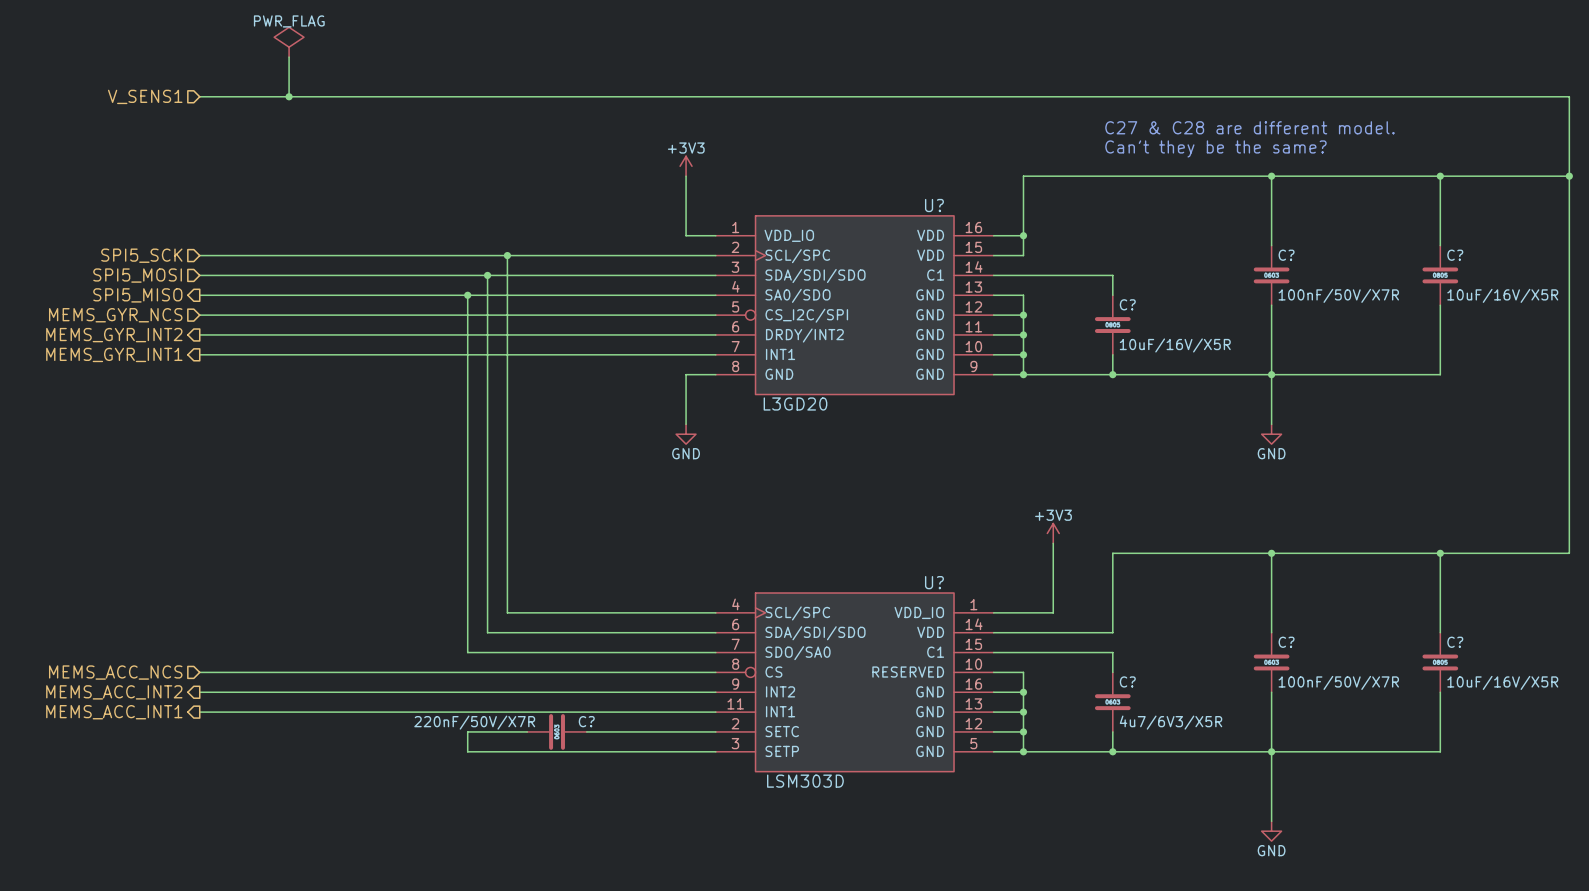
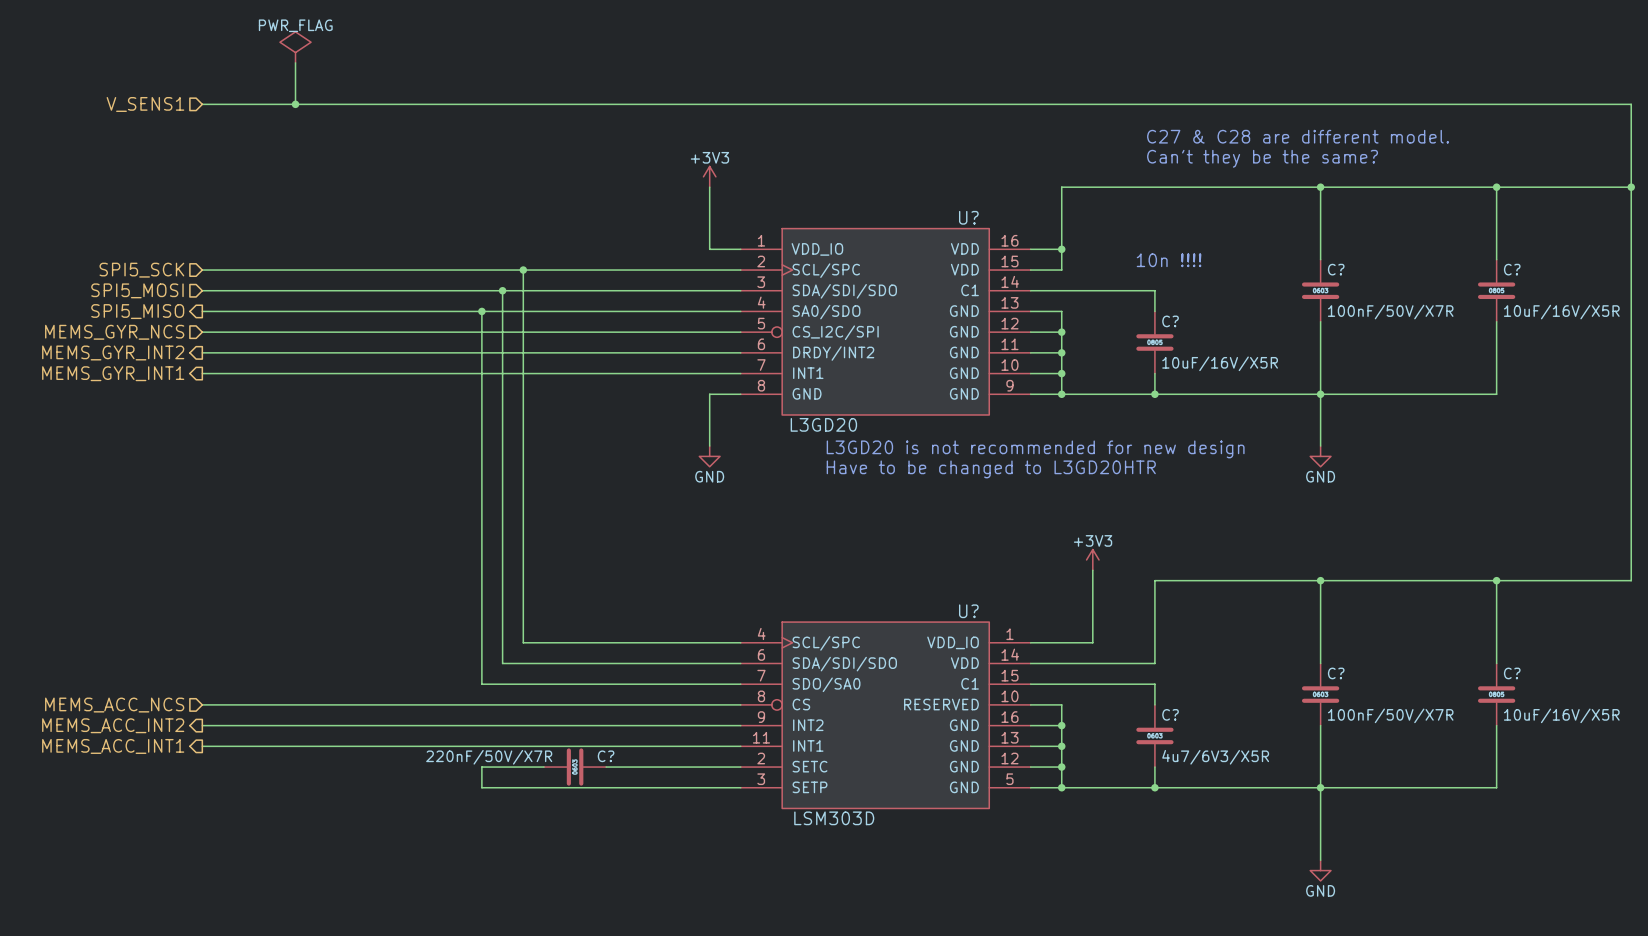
text: none -> 10n !!!! (1169, 260)
text: none -> L3GD20 is not recommended for new design (1035, 449)
text: none -> Have to be changed to L3GD20HTR (991, 469)

